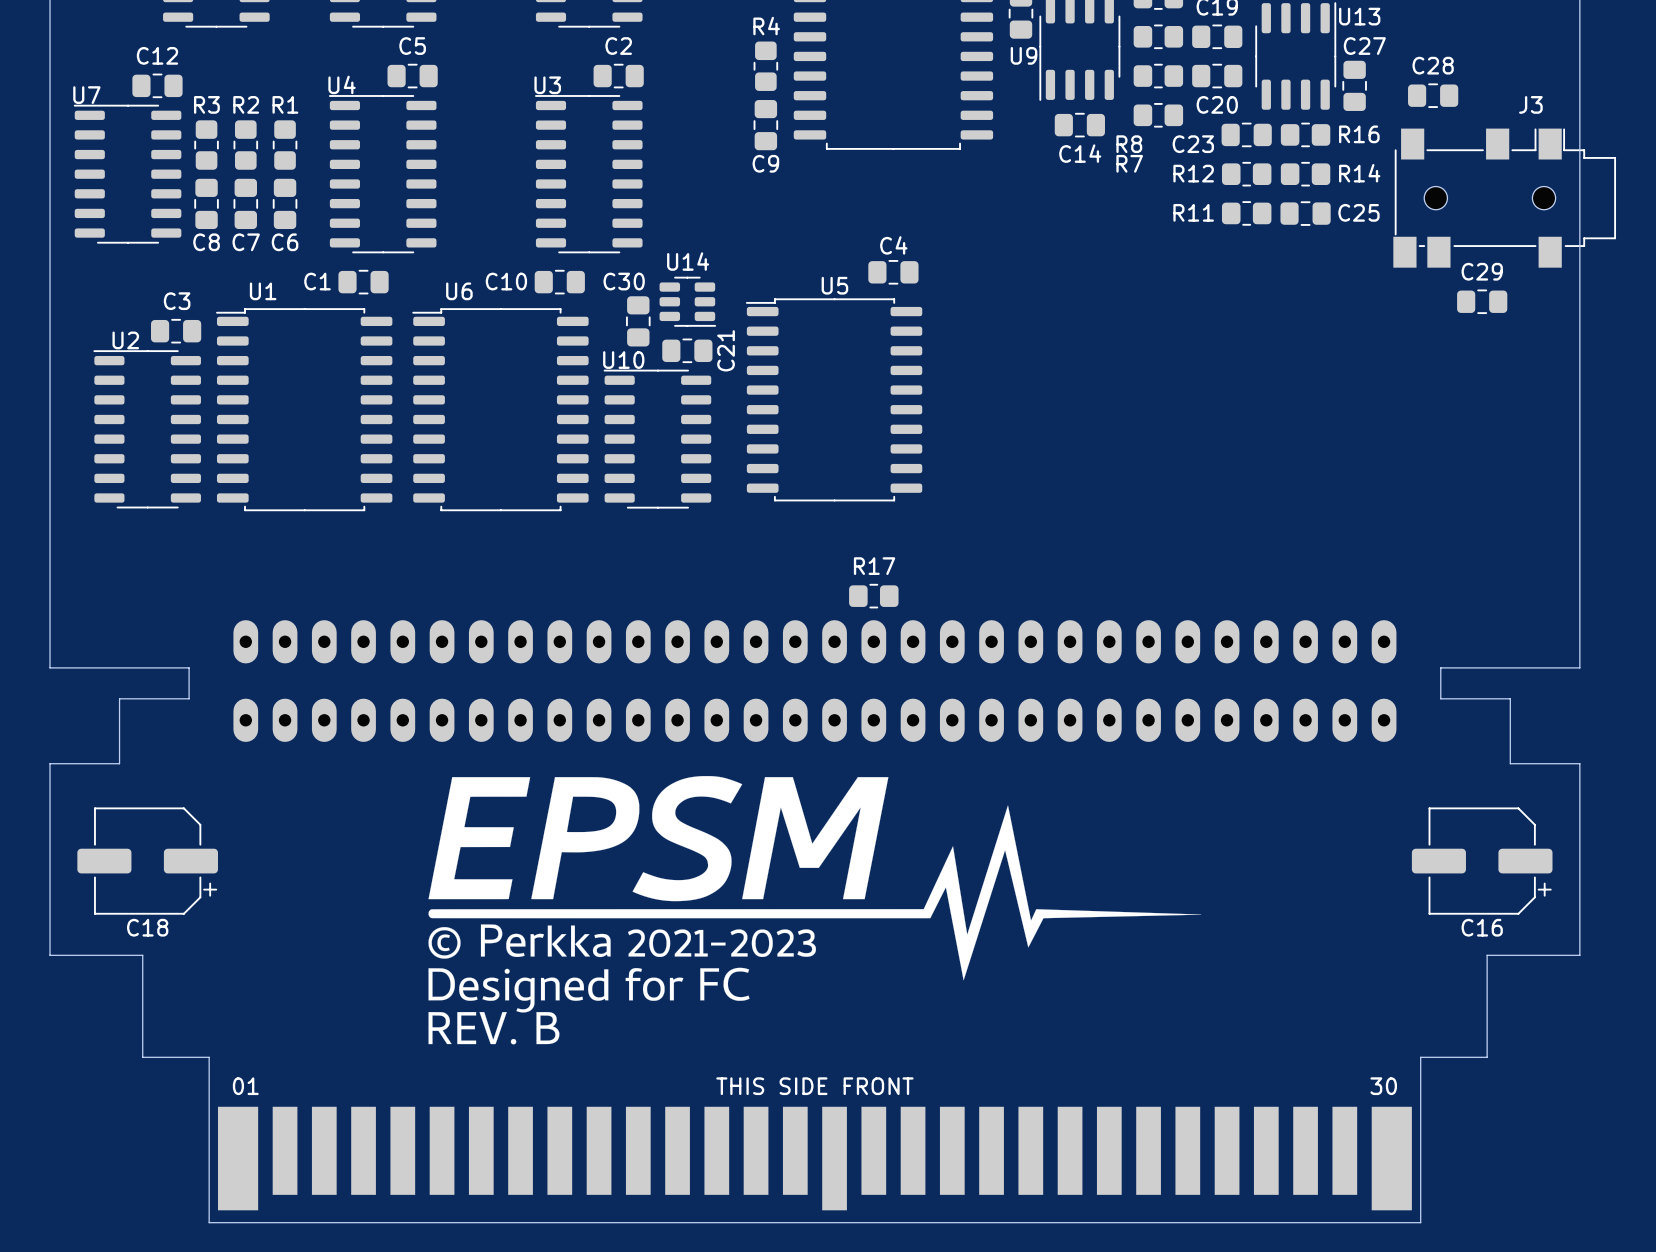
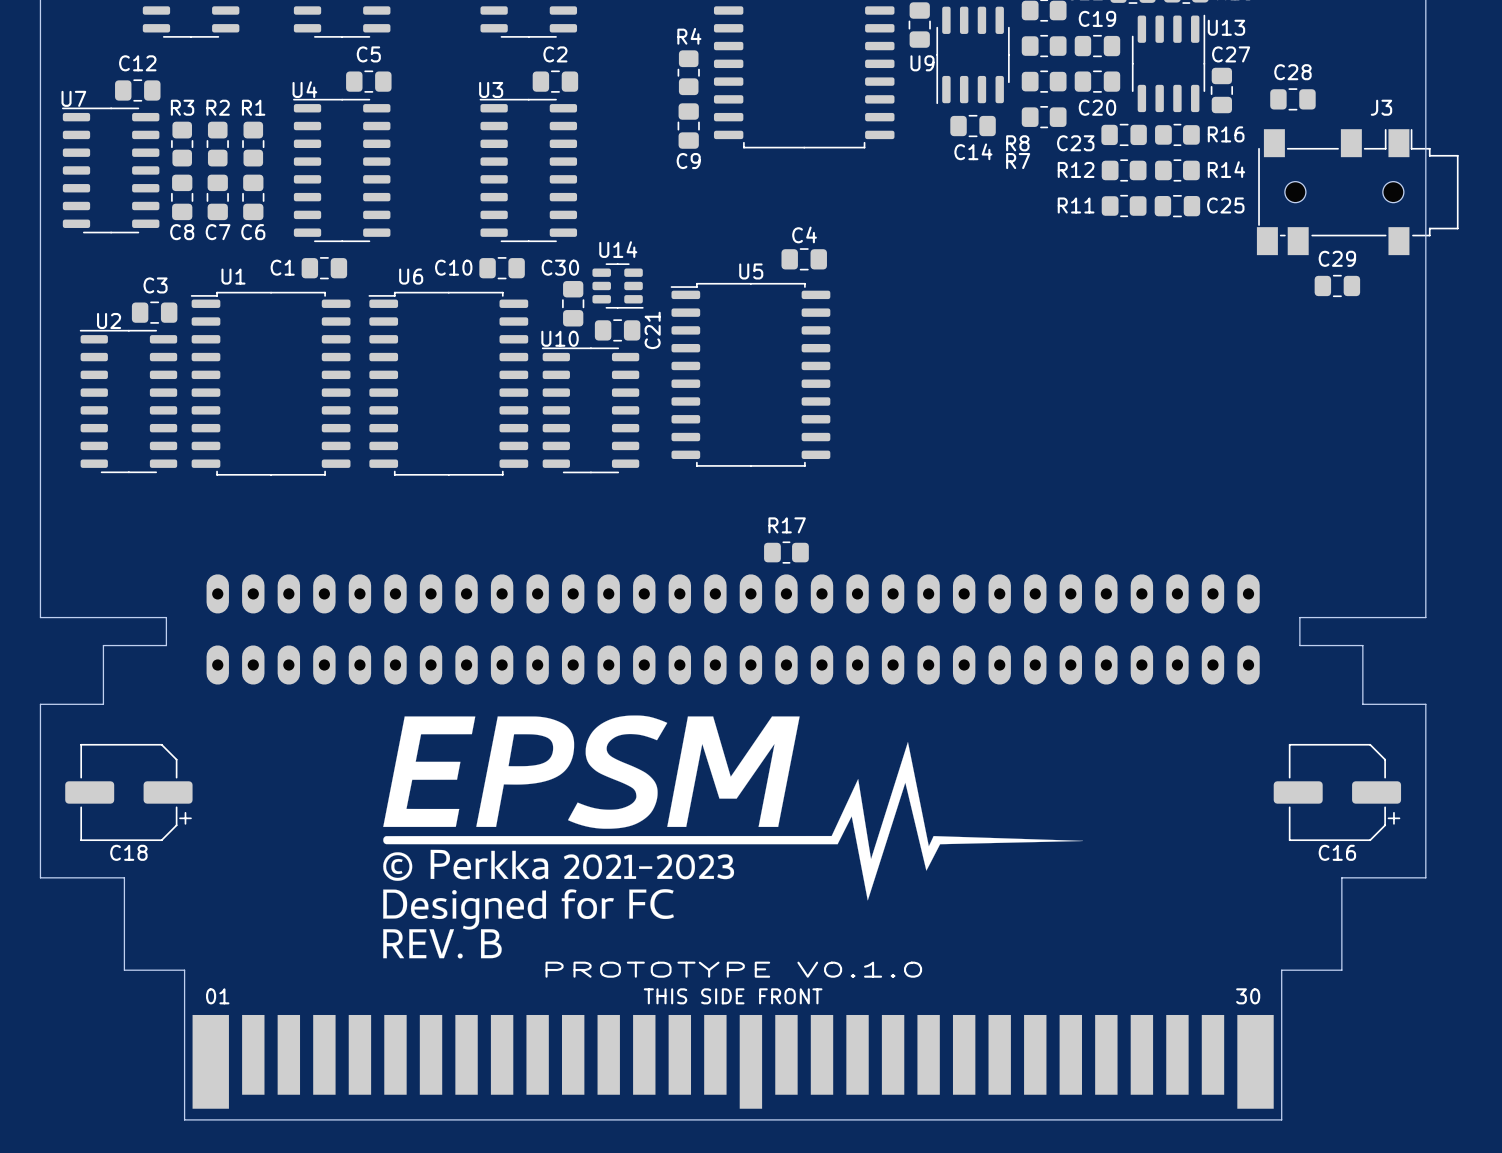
text: none -> PROTOTYPE V0.1.0 (733, 969)

